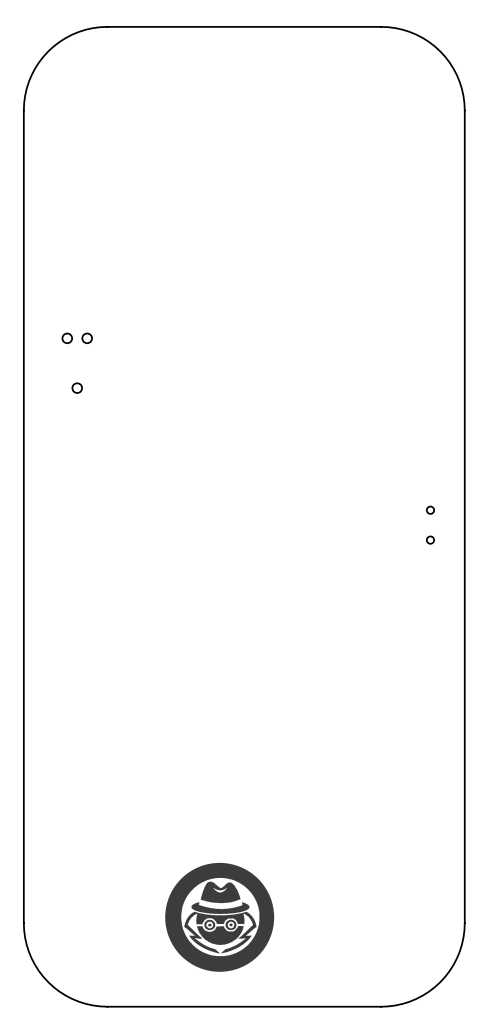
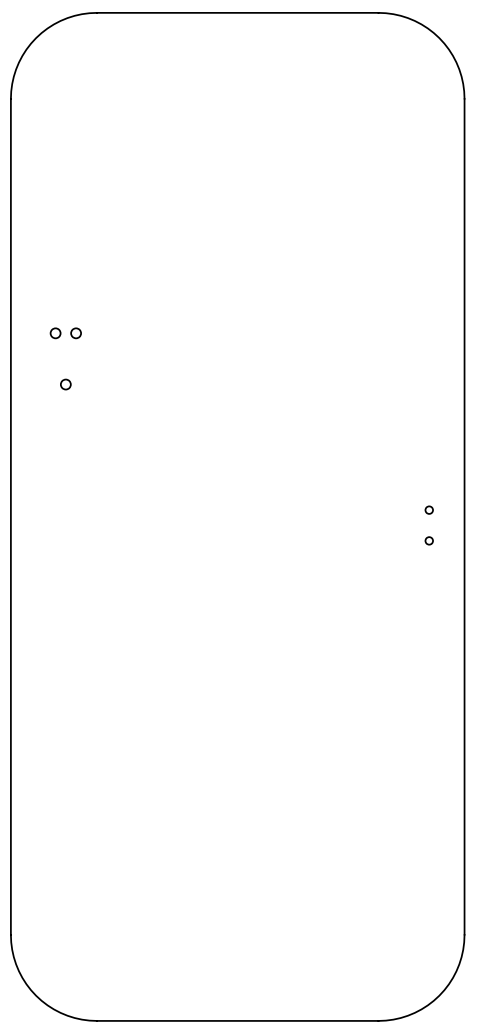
part: (219, 917) -> none

